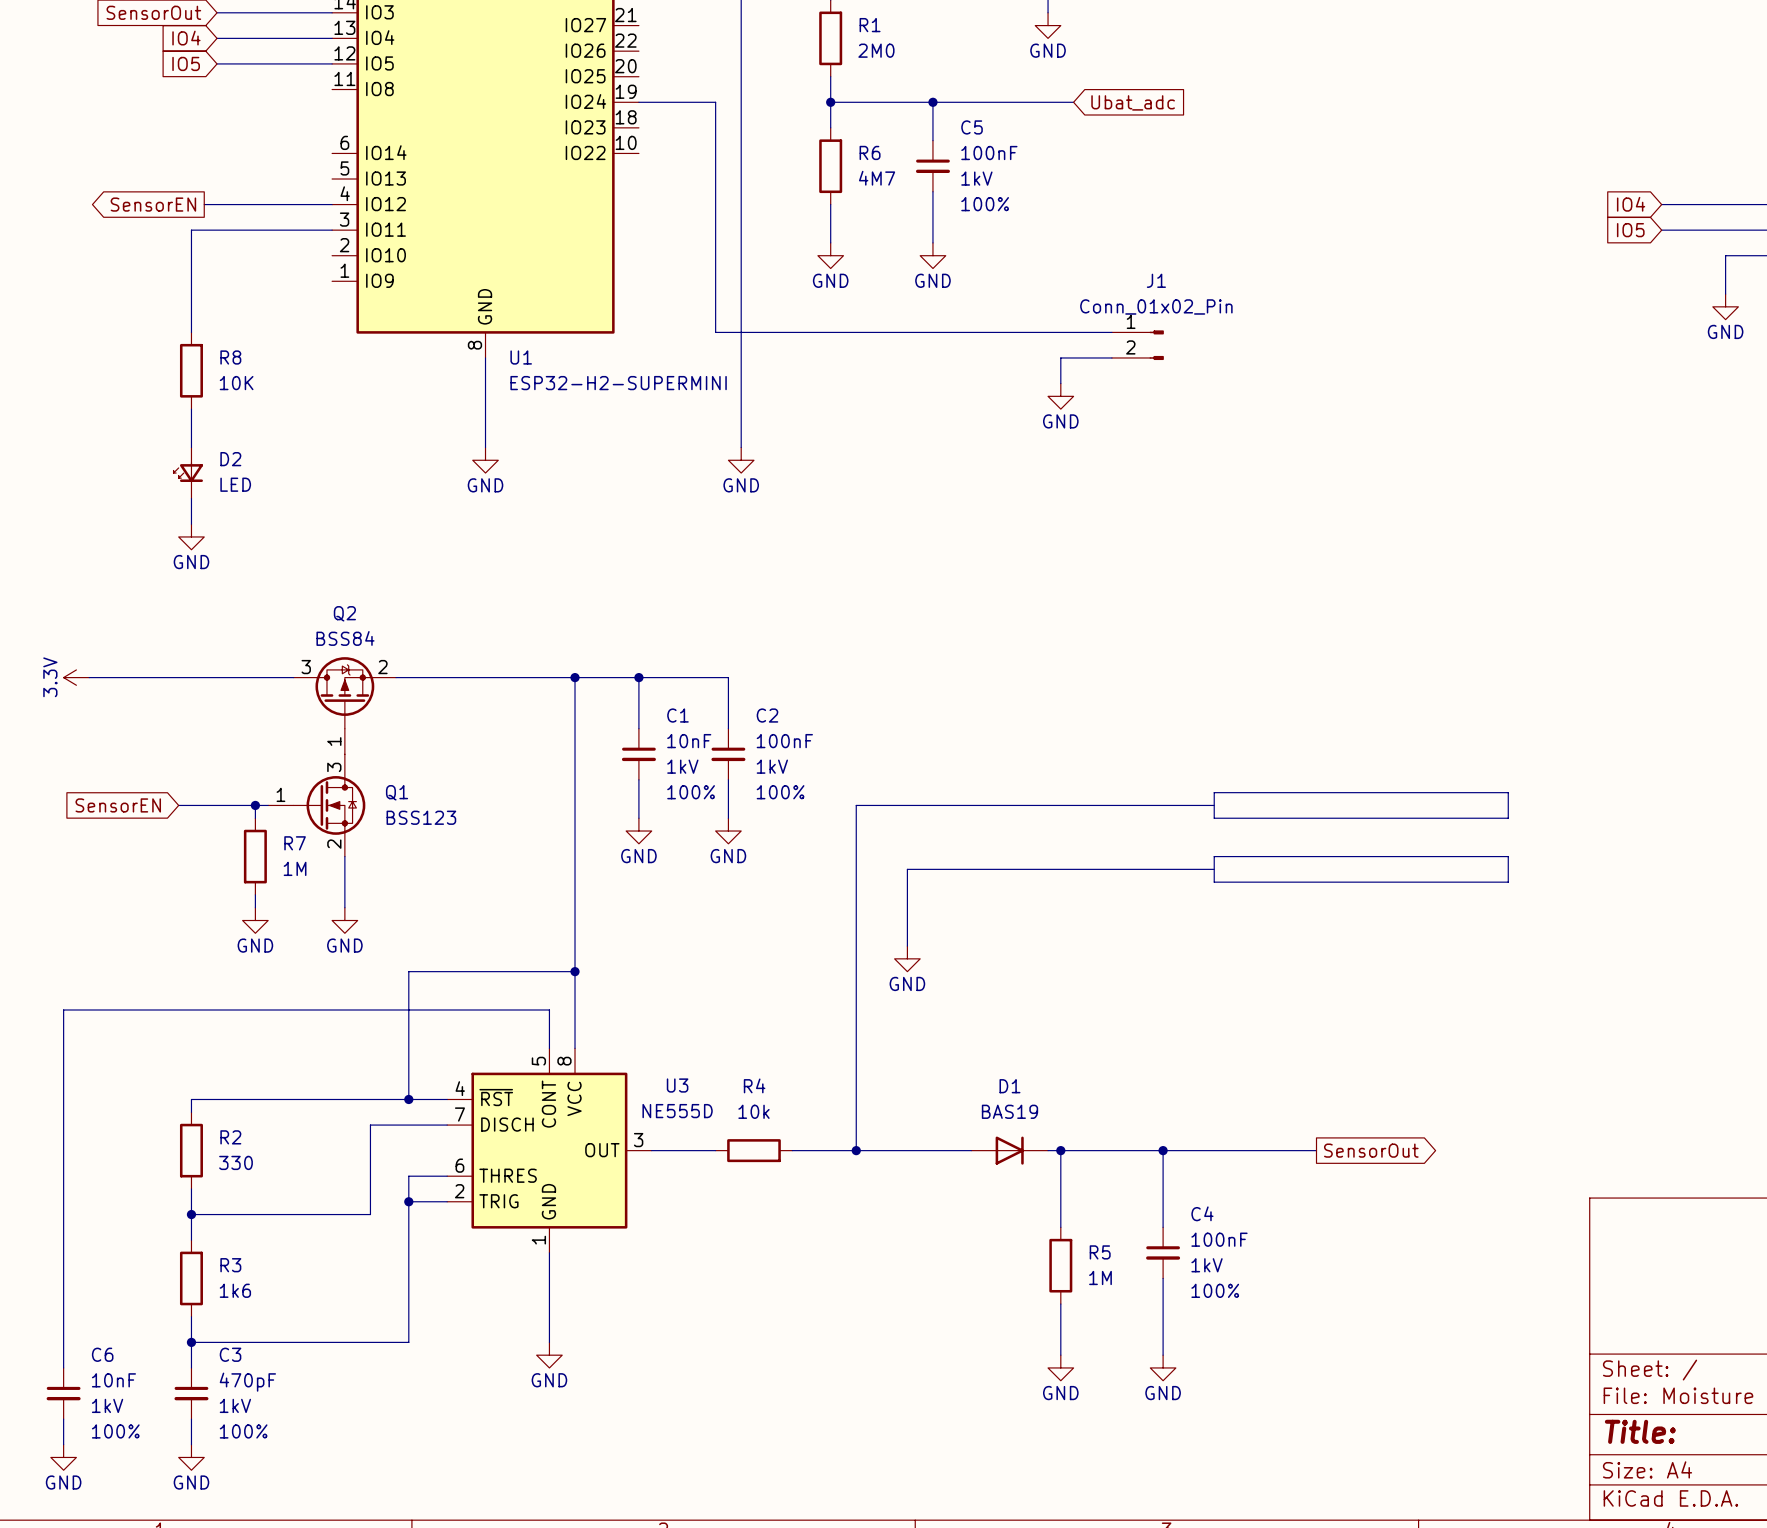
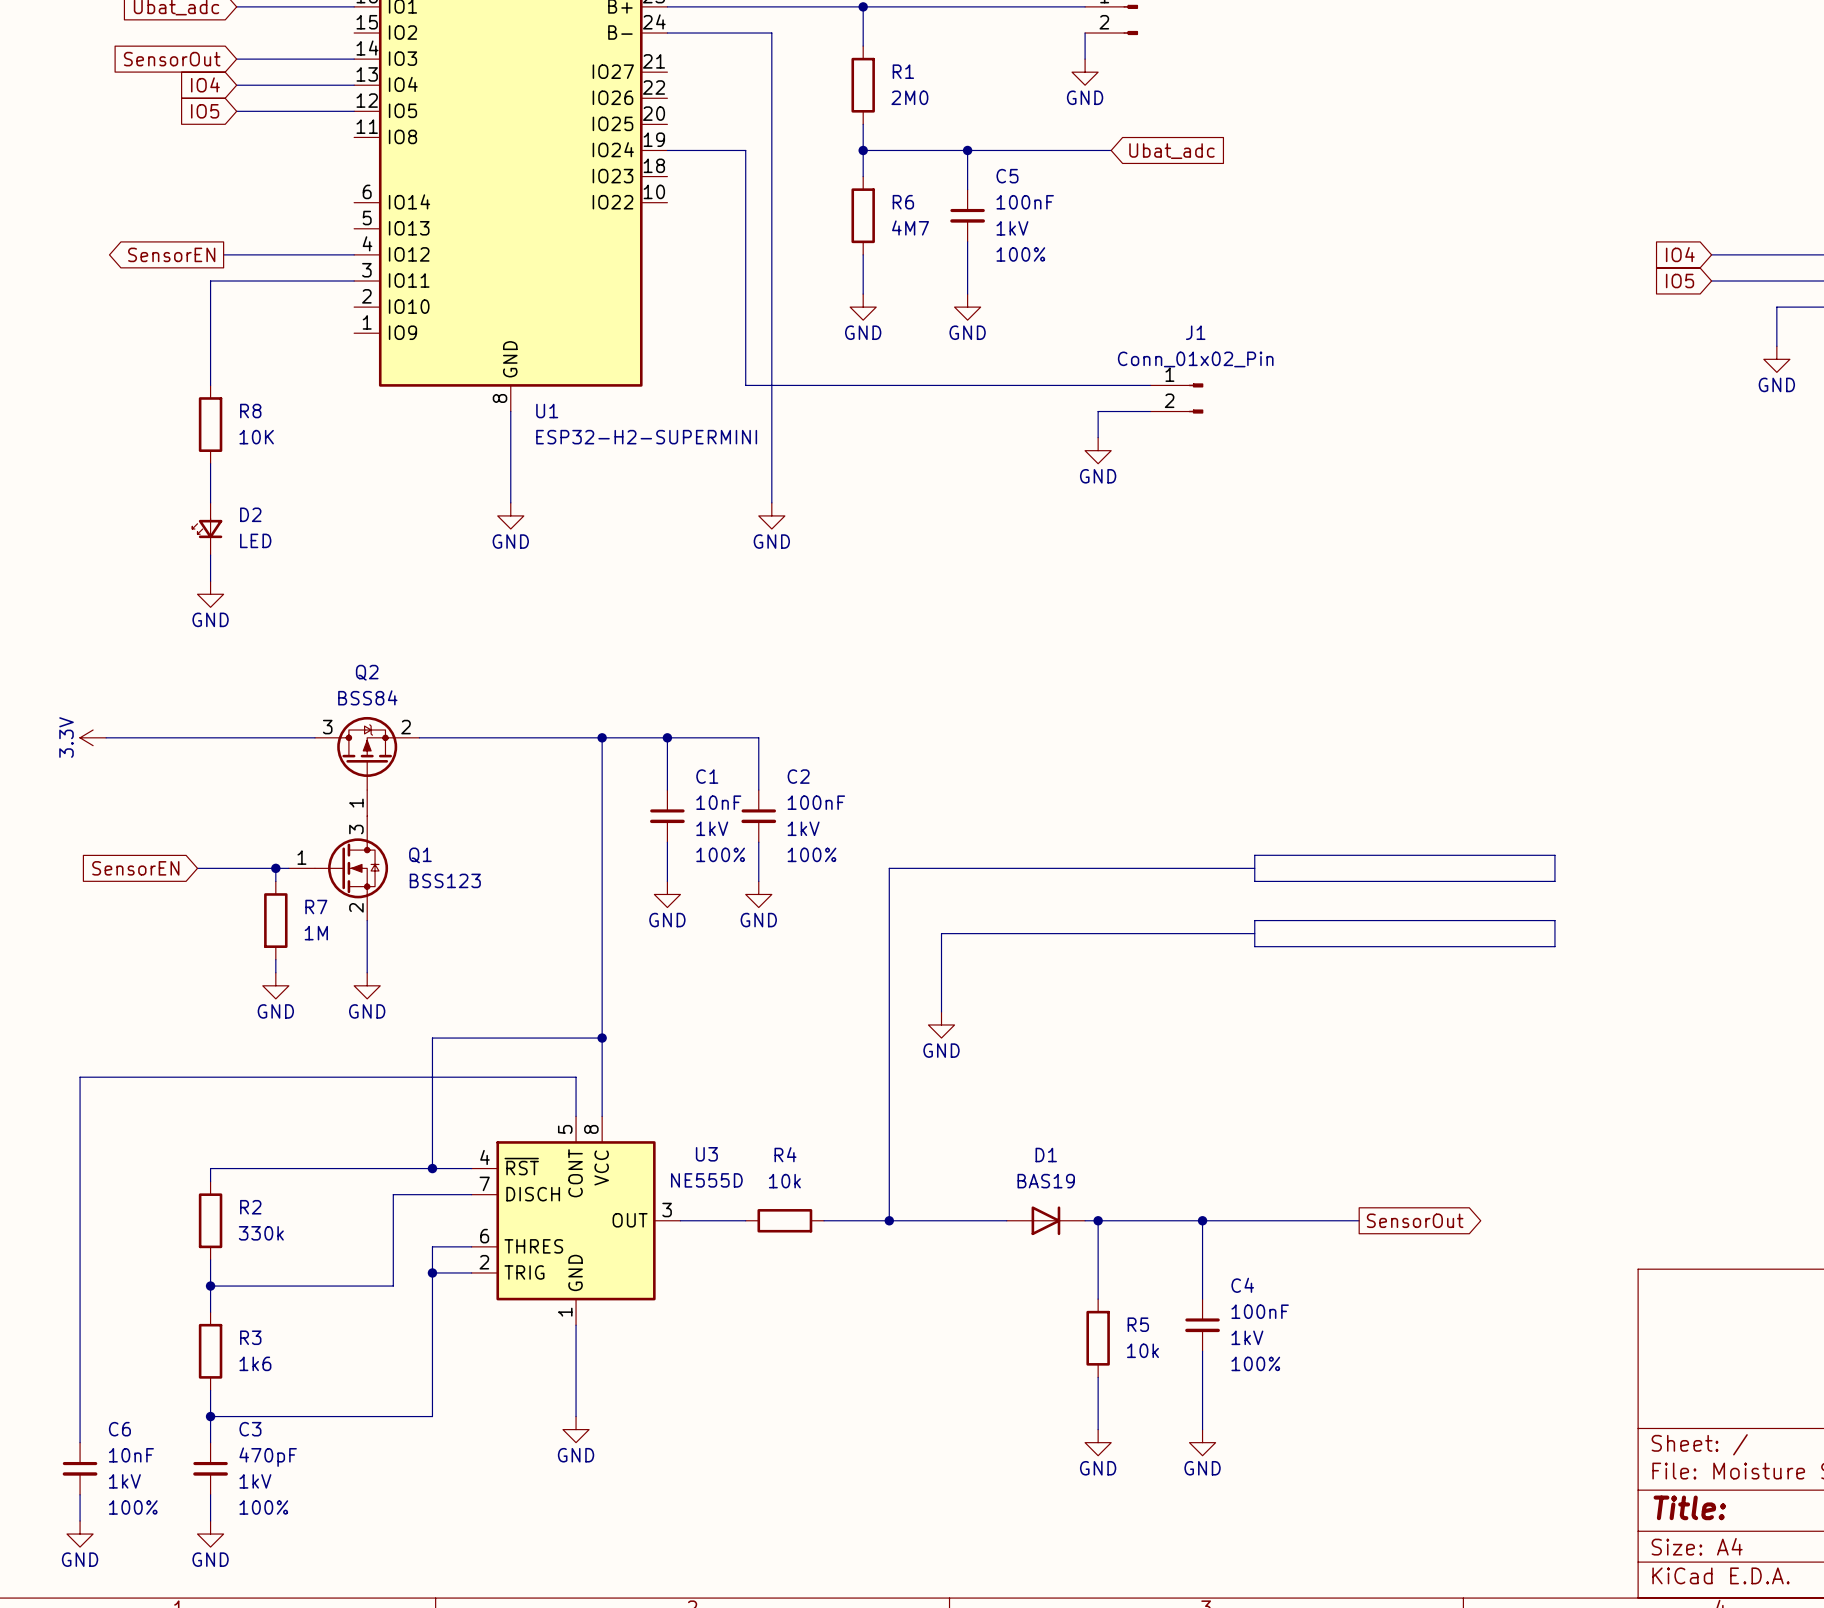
R2 value: 330 (236, 1162) -> 330k (261, 1233)
R5 value: 1M (1100, 1277) -> 10k (1142, 1350)

